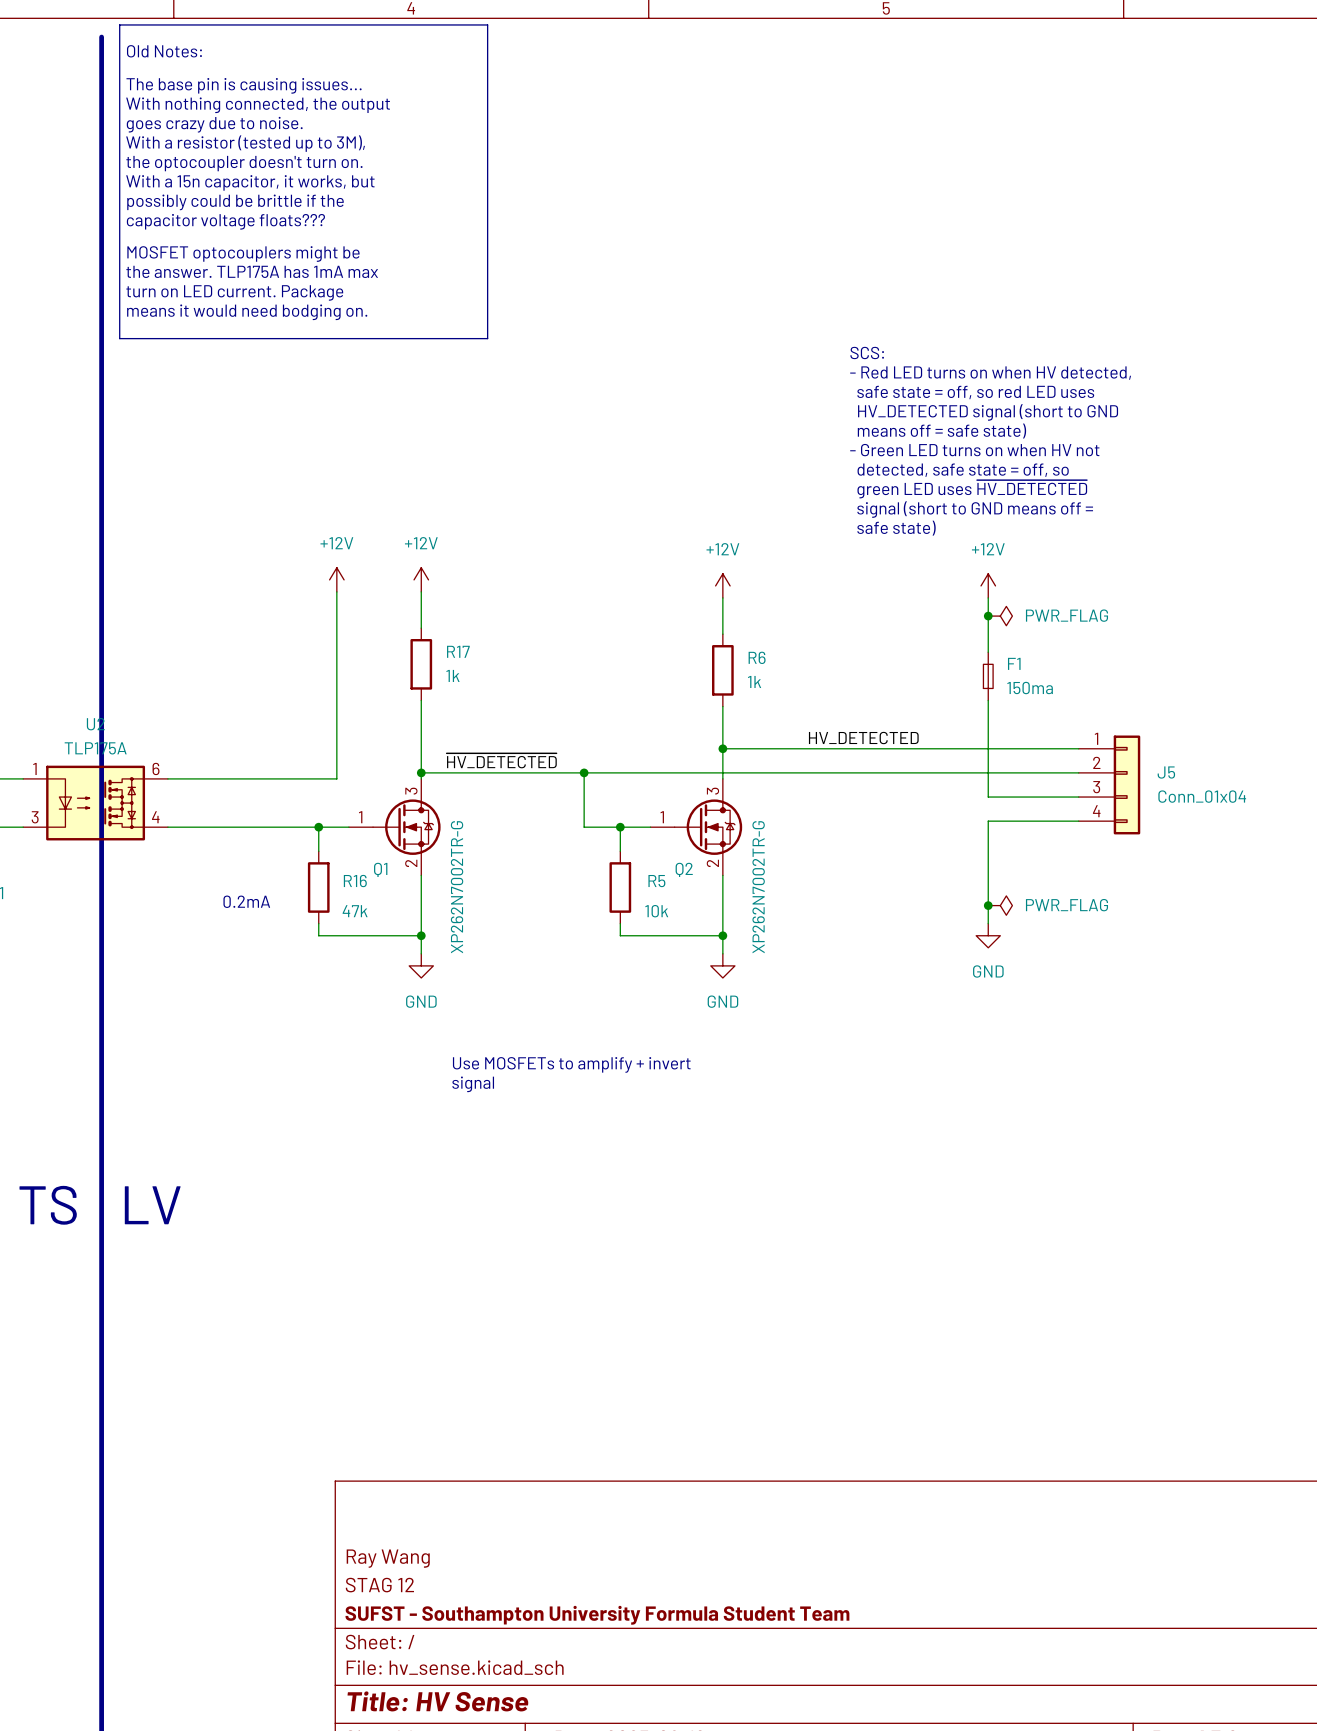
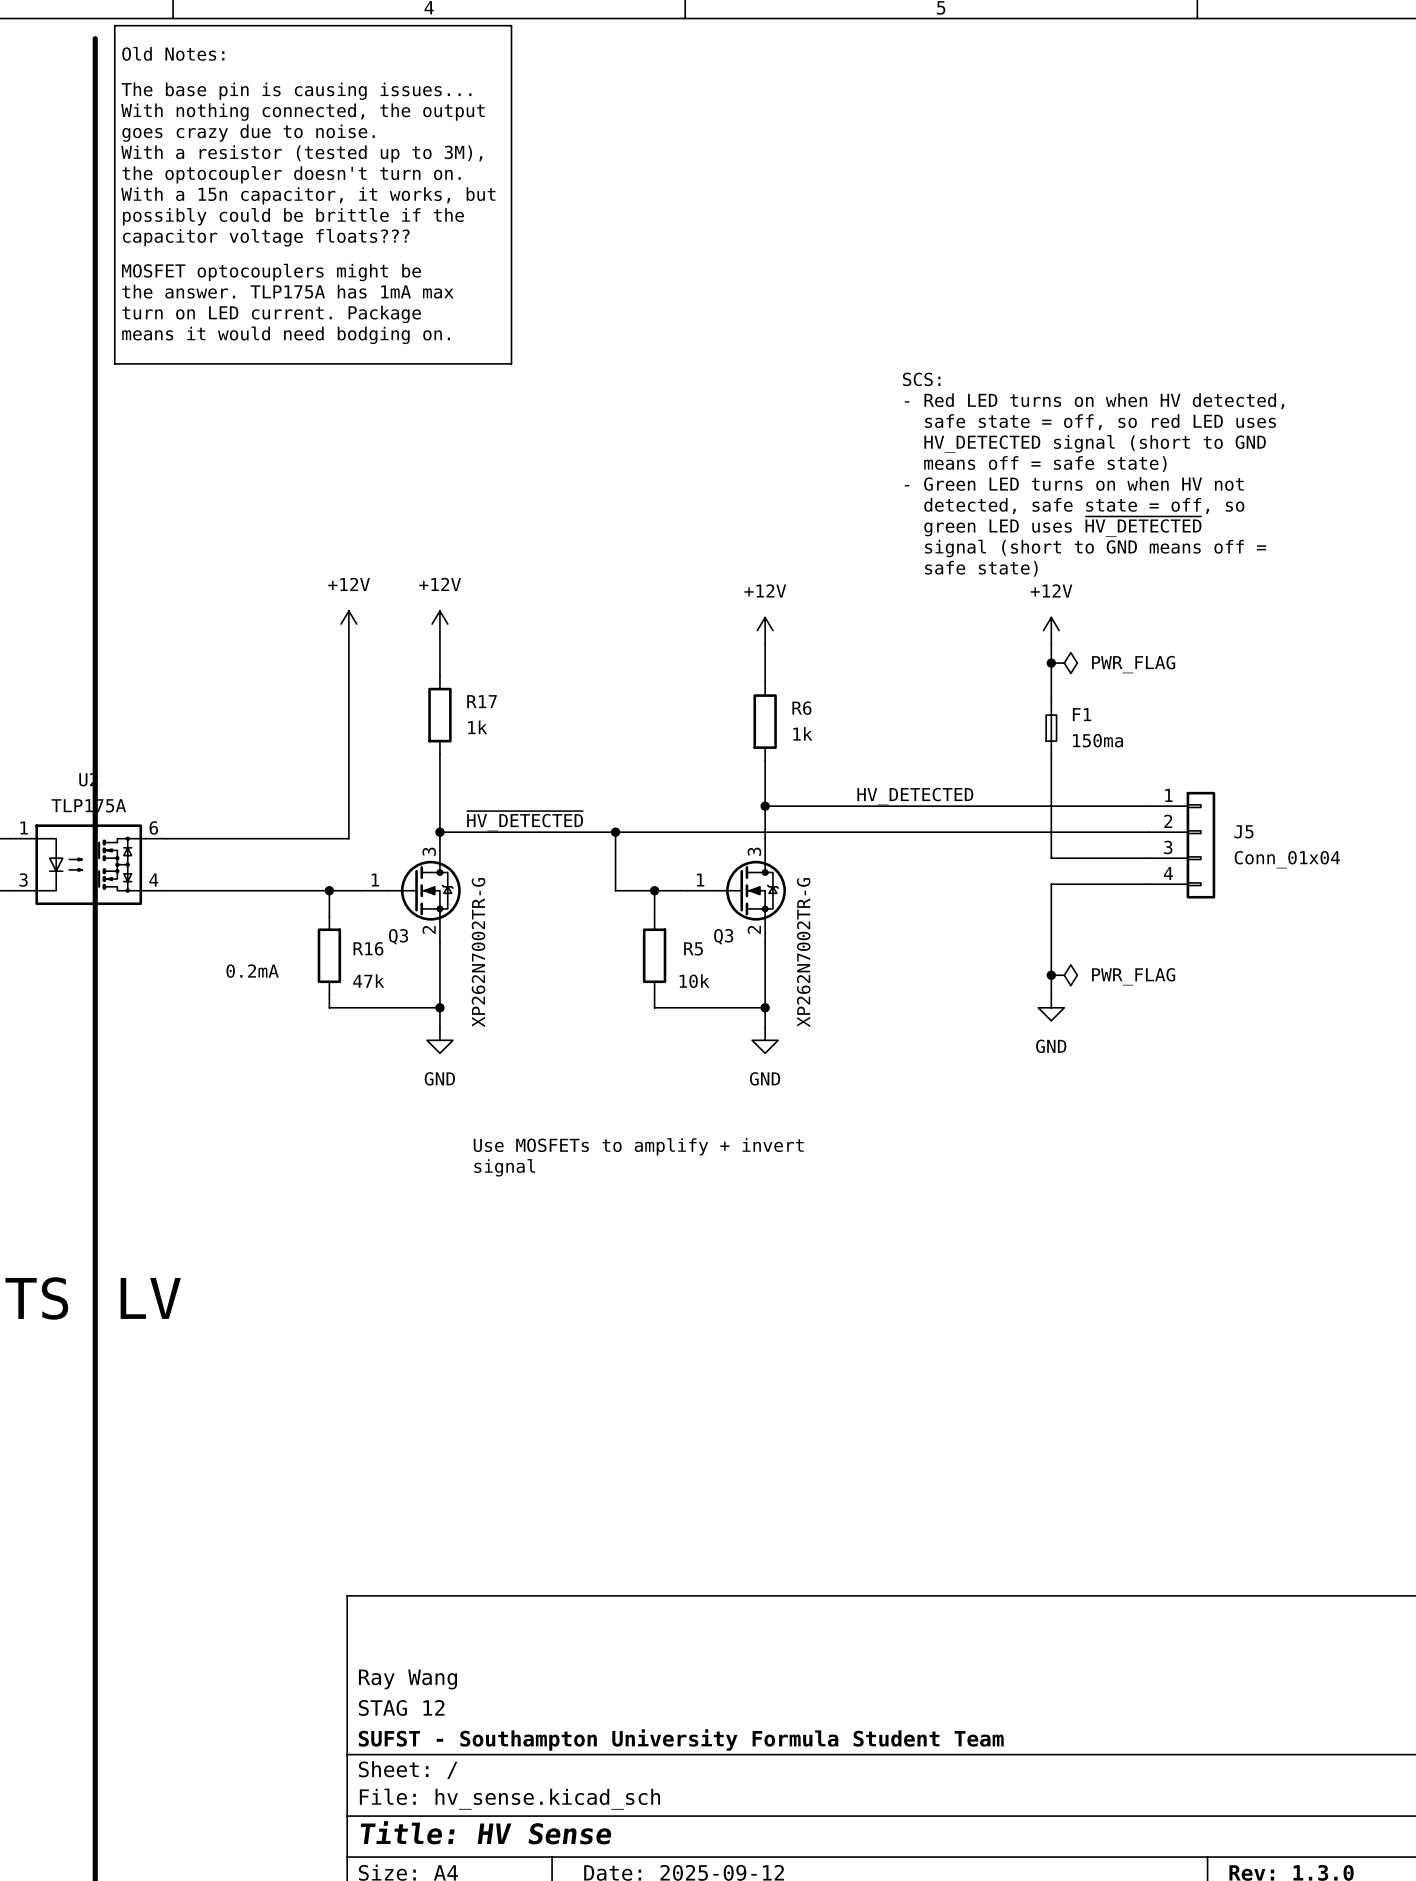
Q1 name: Q1 (380, 869) -> Q3 (398, 936)
Q2 name: Q2 (684, 869) -> Q3 (723, 936)

